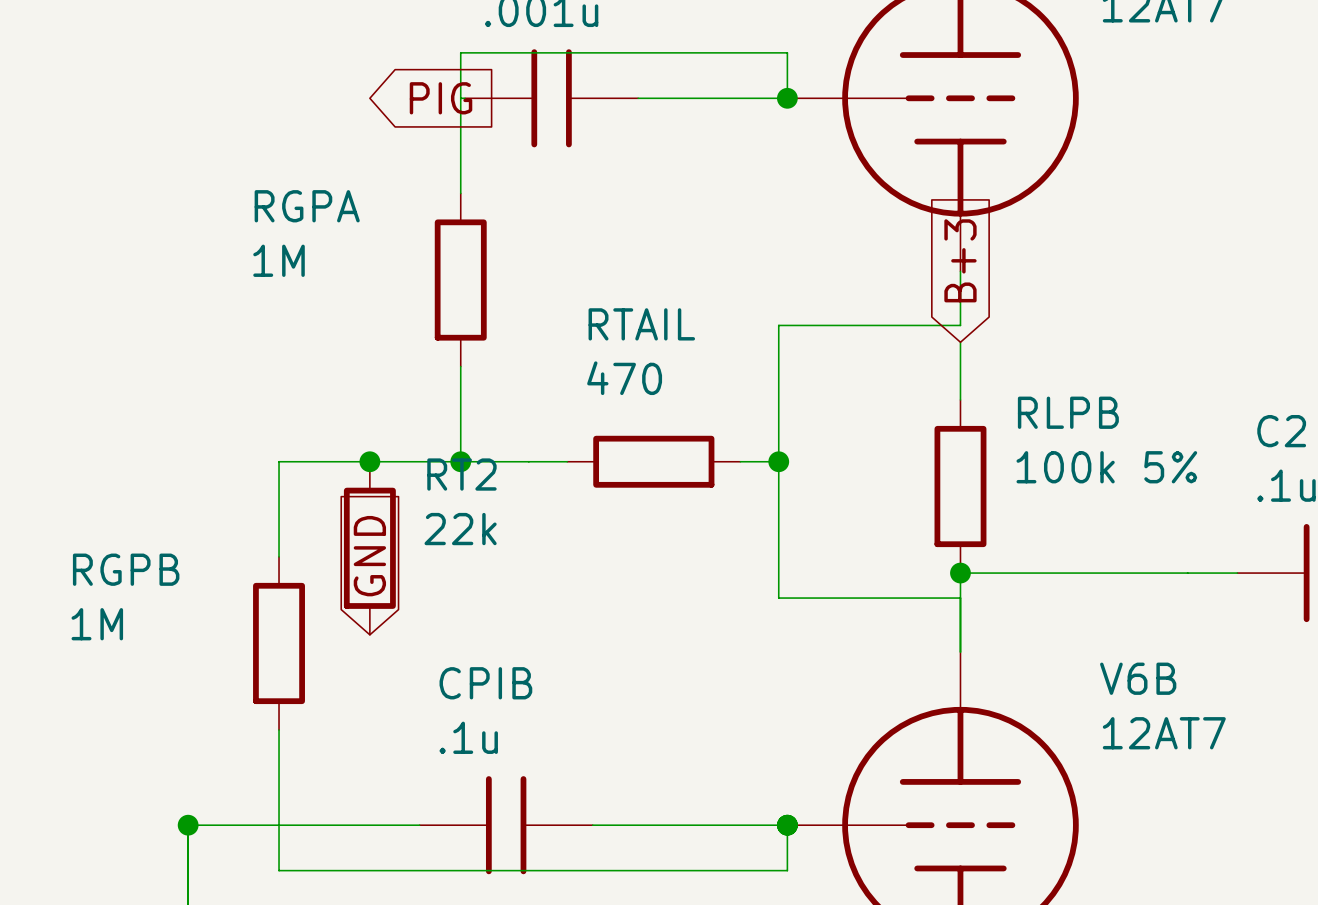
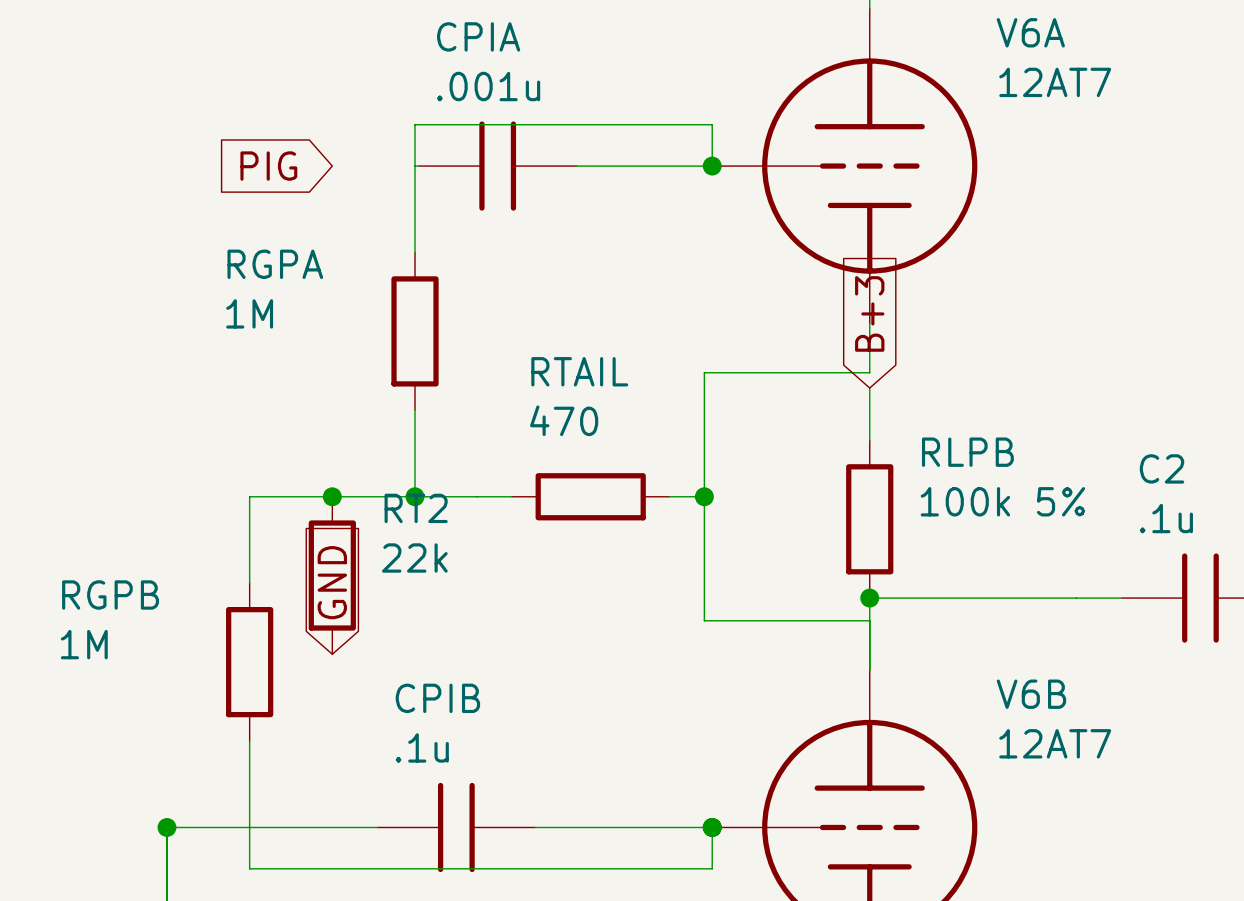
global label rotation: 0° (441, 98) -> 180° (268, 166)
global label position: PIG (441, 98) -> PIG (268, 166)

